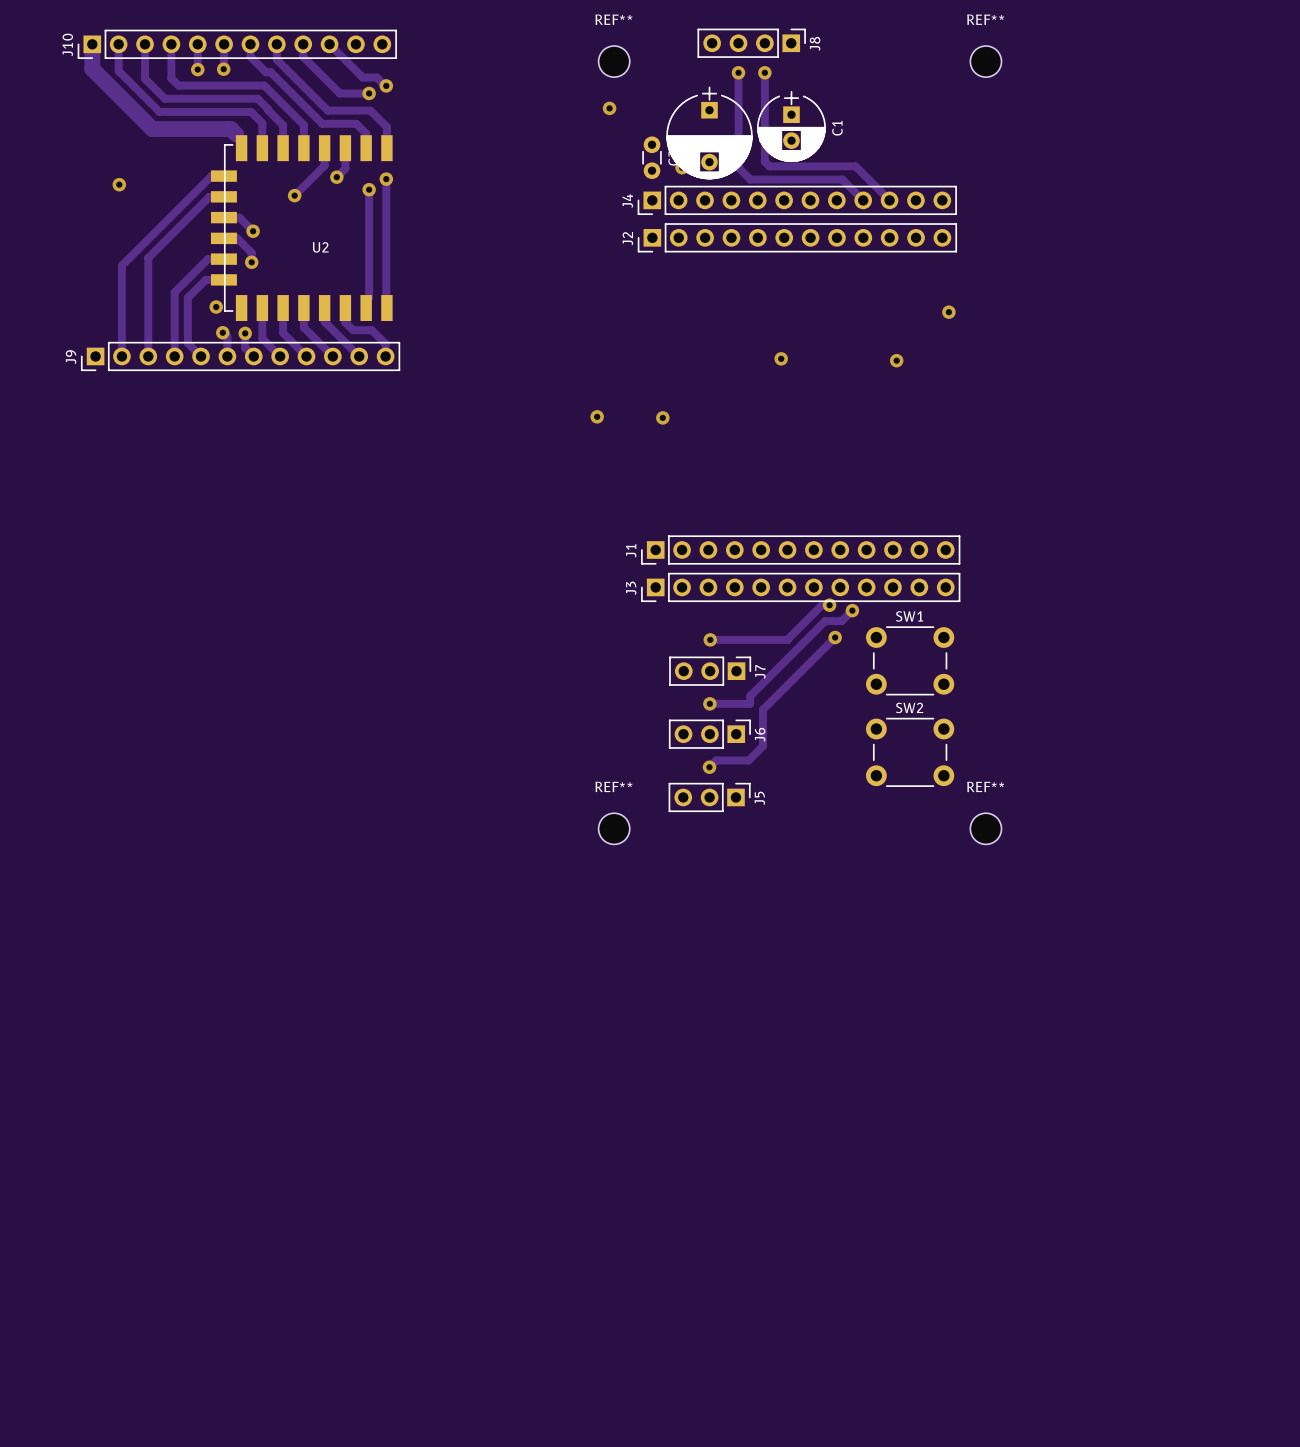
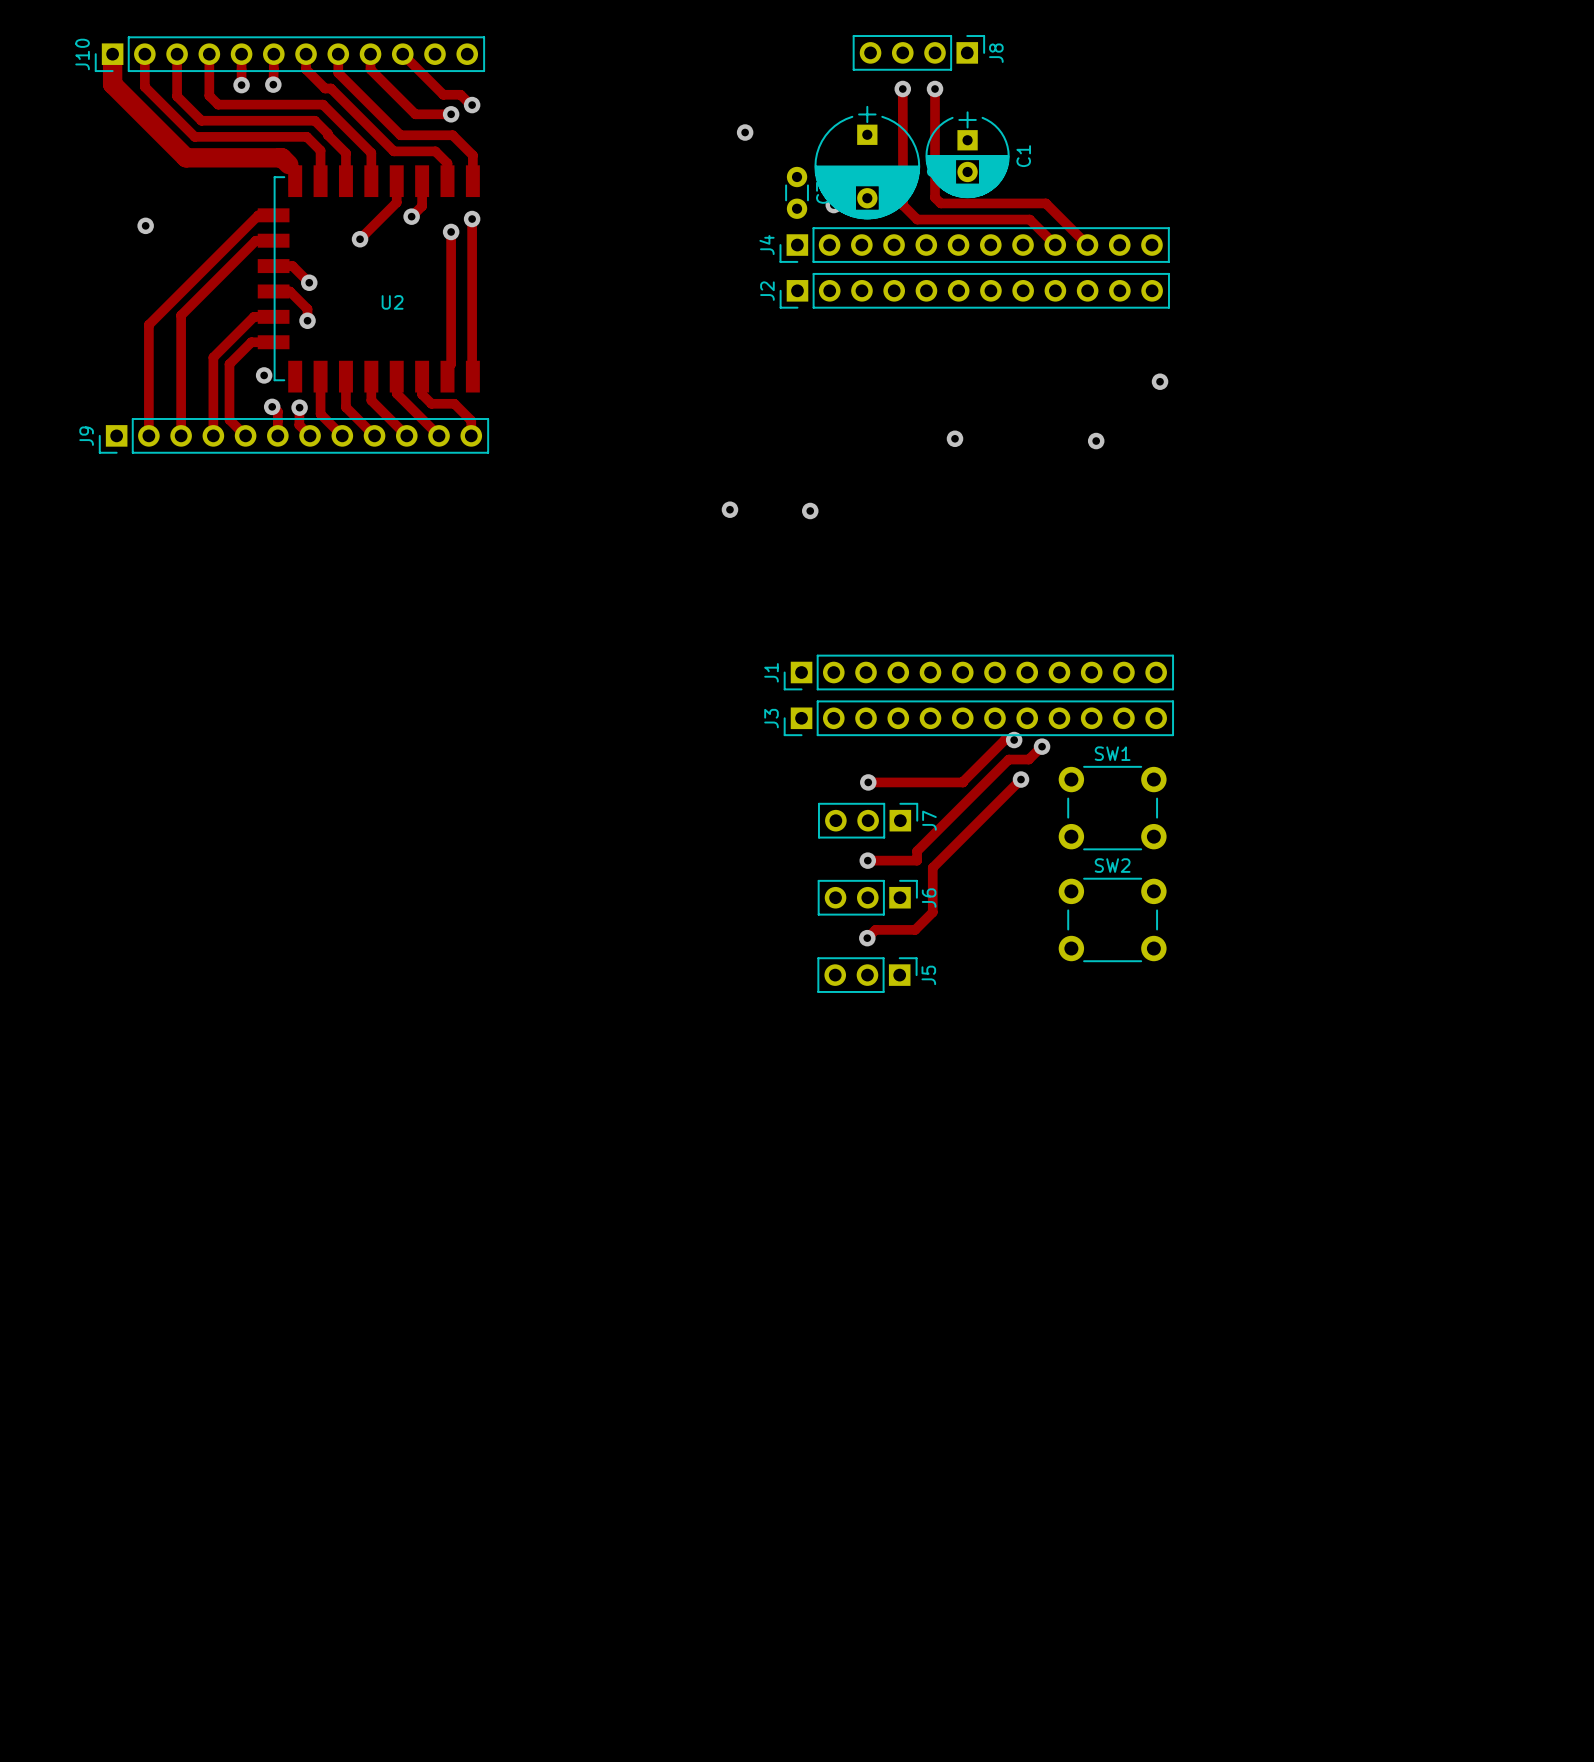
REF**: (614, 61) -> none
REF**: (985, 61) -> none
REF**: (614, 828) -> none
REF**: (985, 828) -> none

